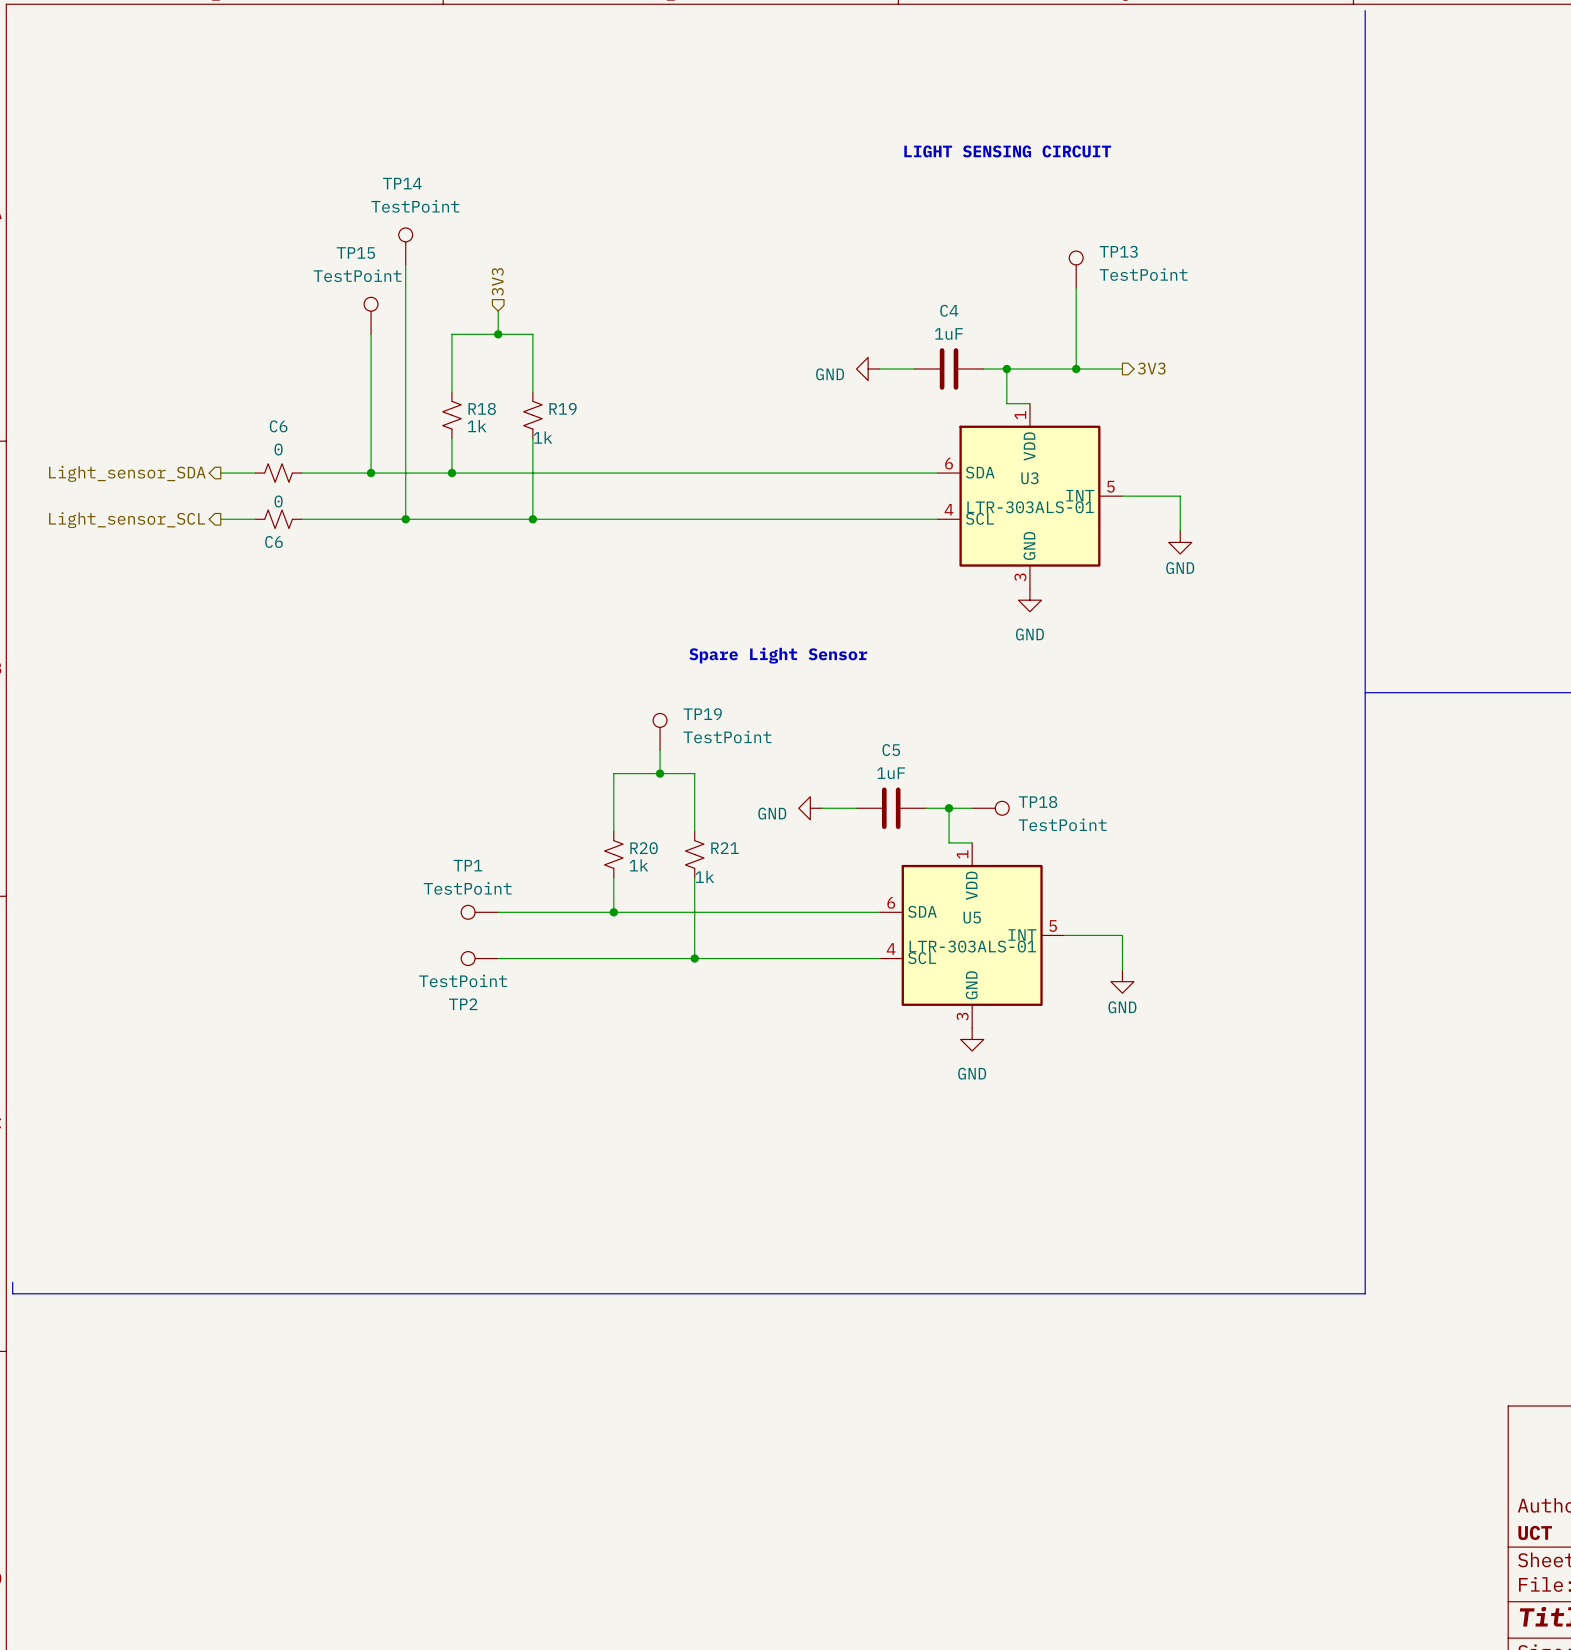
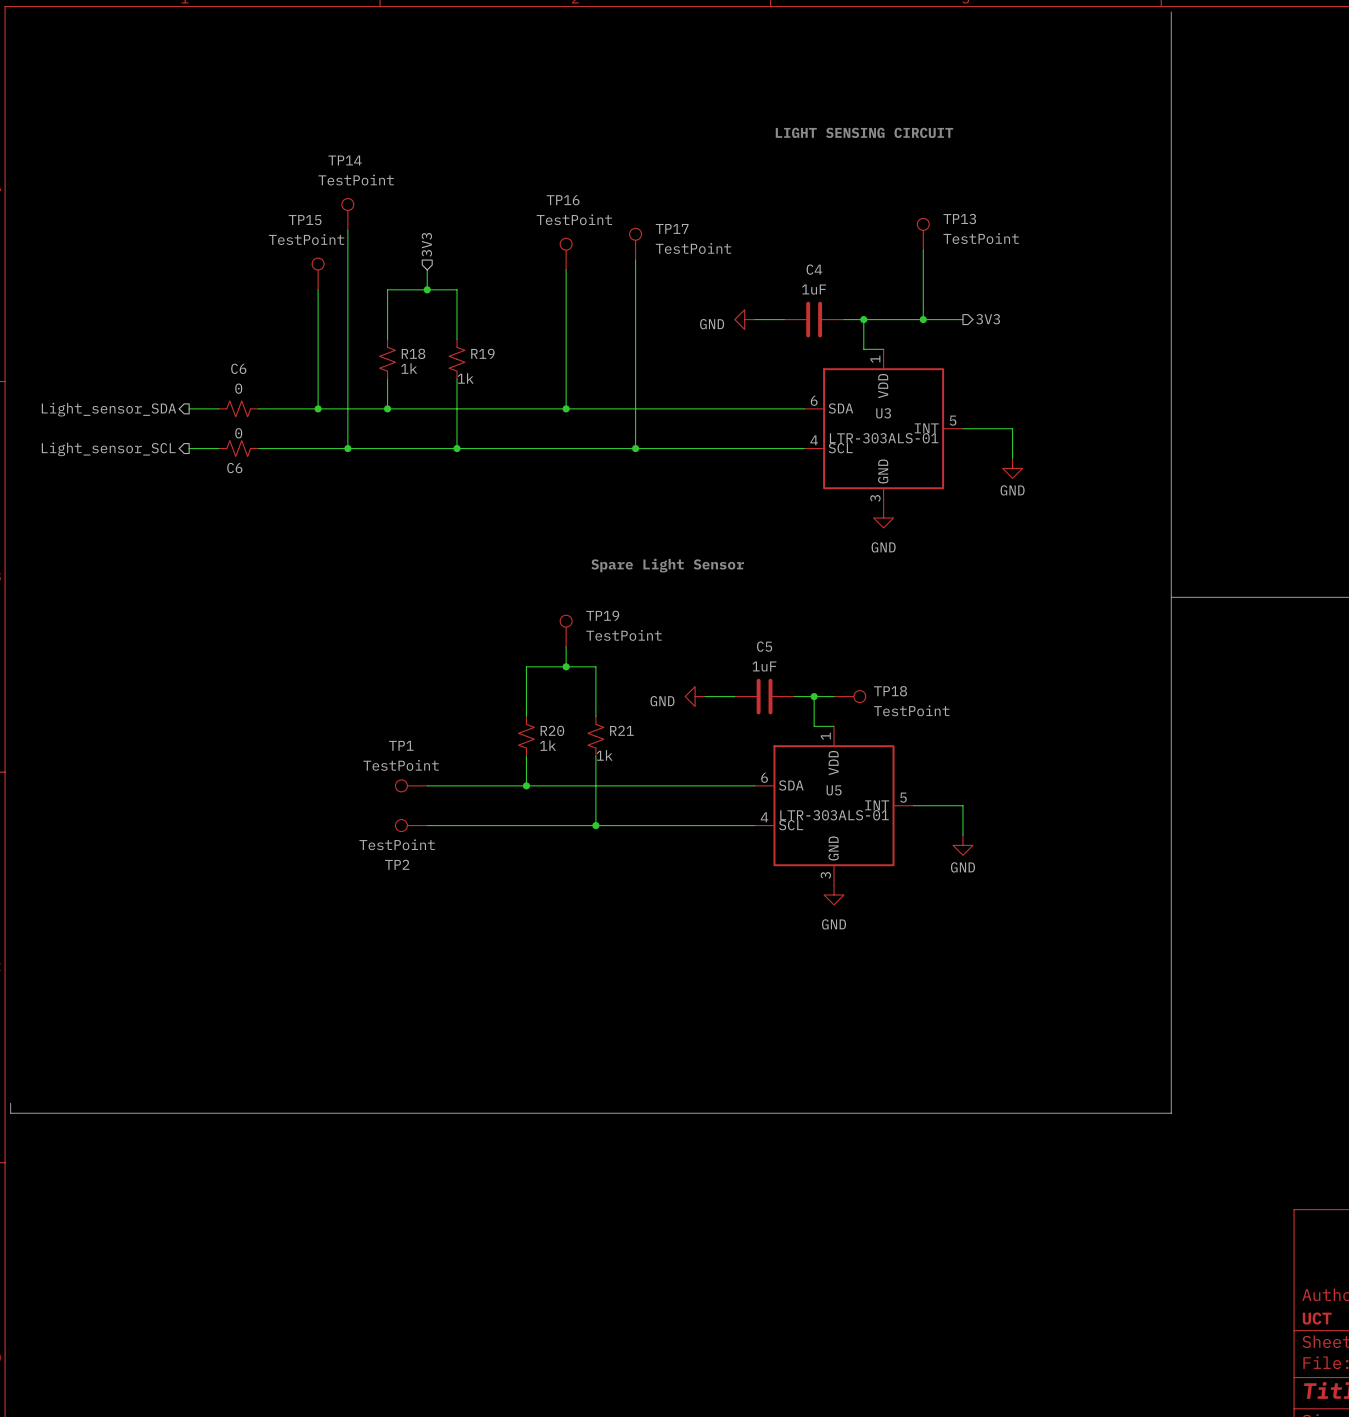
TP17: none -> TestPoint (635, 244)
TP16: none -> TestPoint (566, 254)
wire: none -> (635, 260) (635, 448)
wire: none -> (566, 269) (566, 408)
junction: none -> (566, 408)
junction: none -> (635, 448)

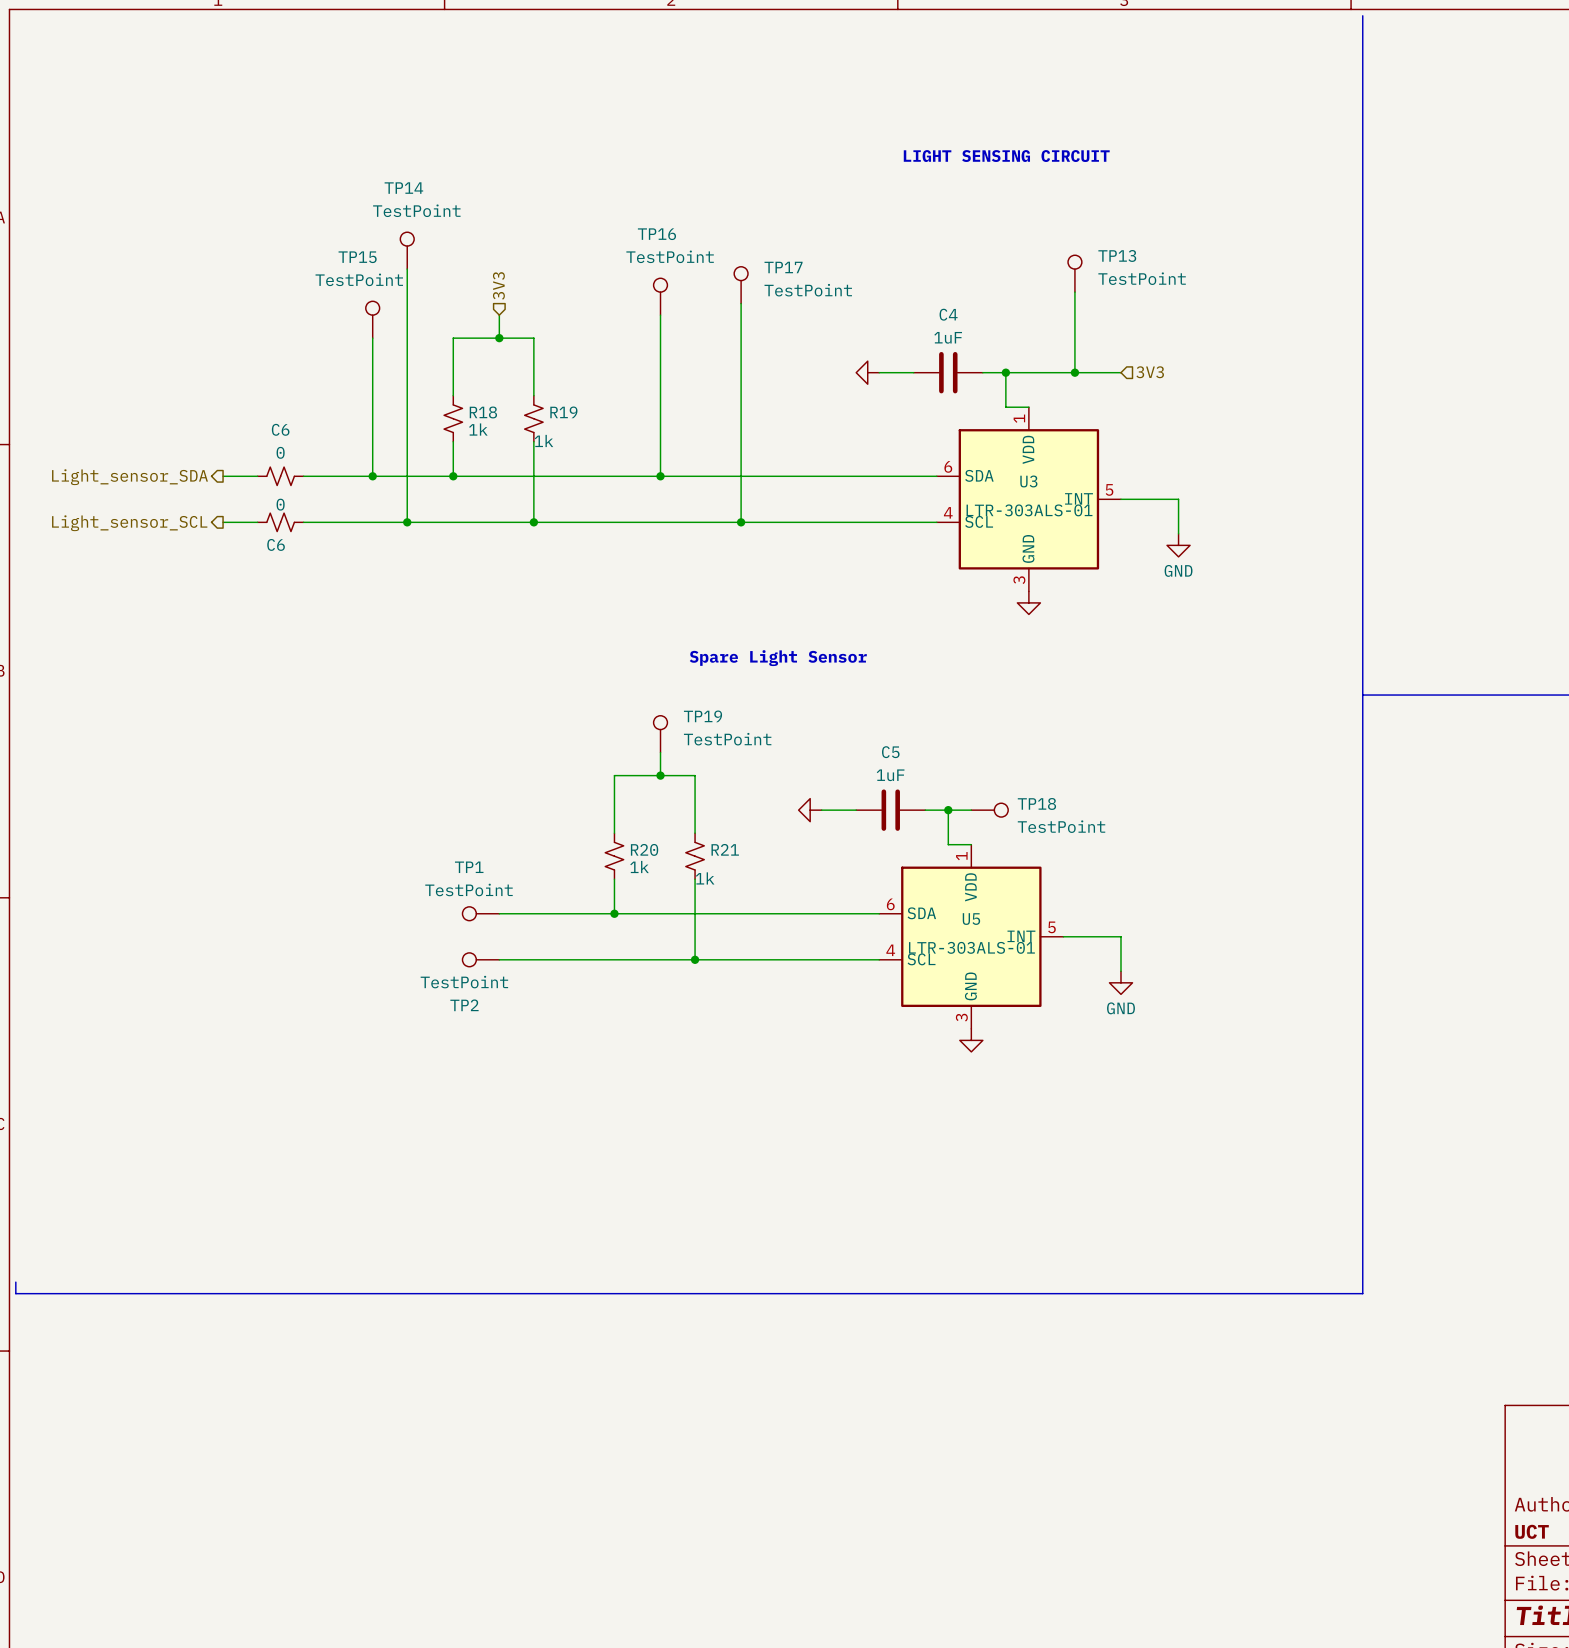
hierarchical label shape: output (988, 319) -> input (1150, 372)
power symbol text: GND (712, 324) -> none
power symbol text: GND (883, 547) -> none
power symbol text: GND (662, 701) -> none
power symbol text: GND (834, 924) -> none

